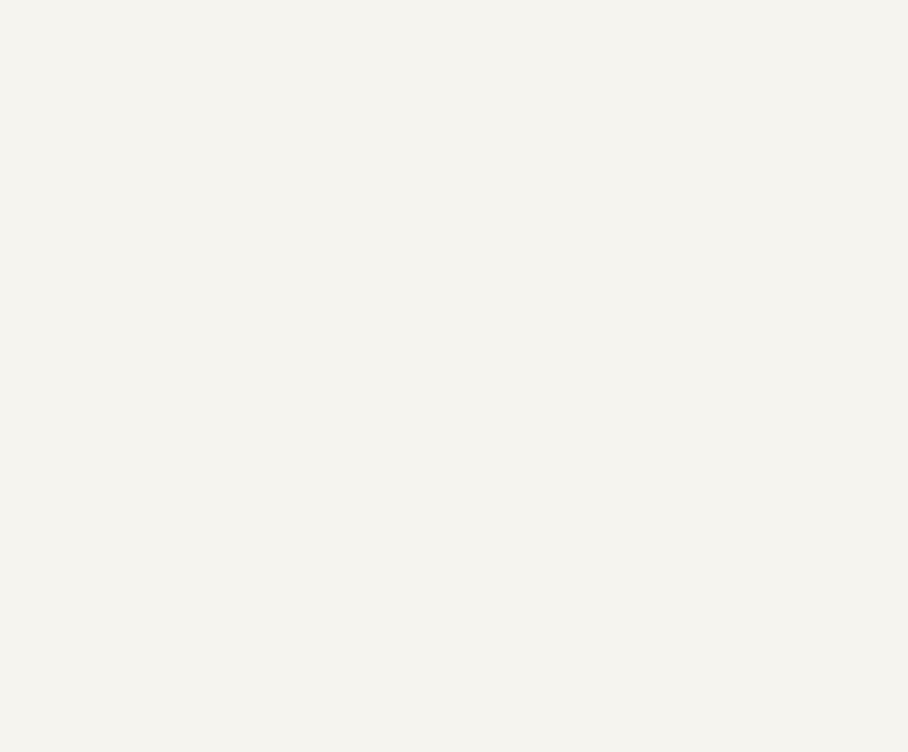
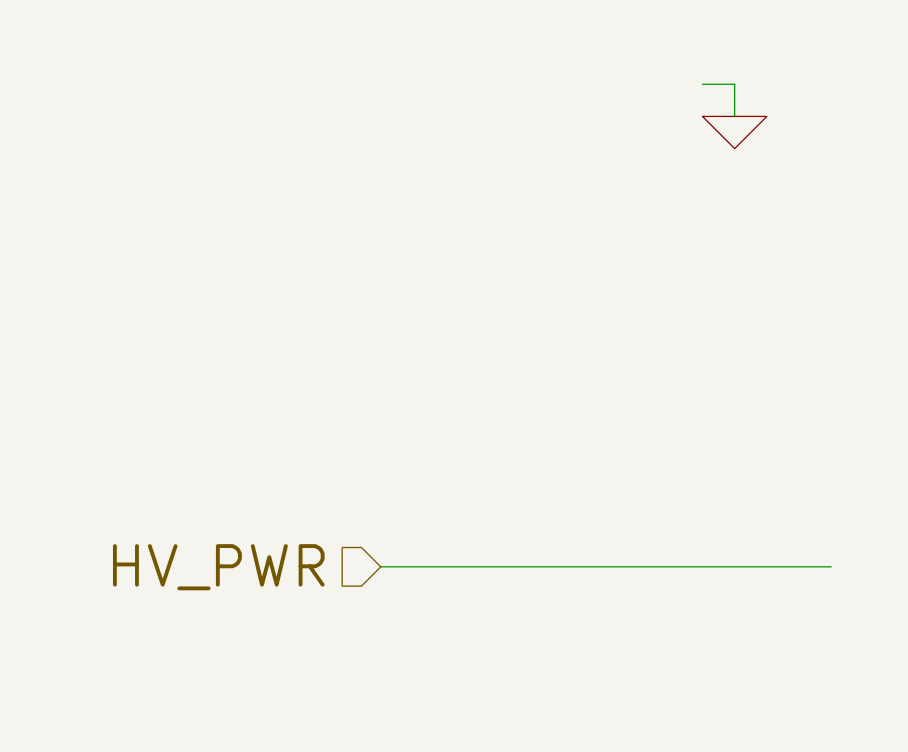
wire: none -> (702, 84) (734, 84) (734, 116)
power symbol: none -> (734, 132)
wire: none -> (380, 566) (831, 566)
hierarchical label: none -> HV_PWR (218, 567)

